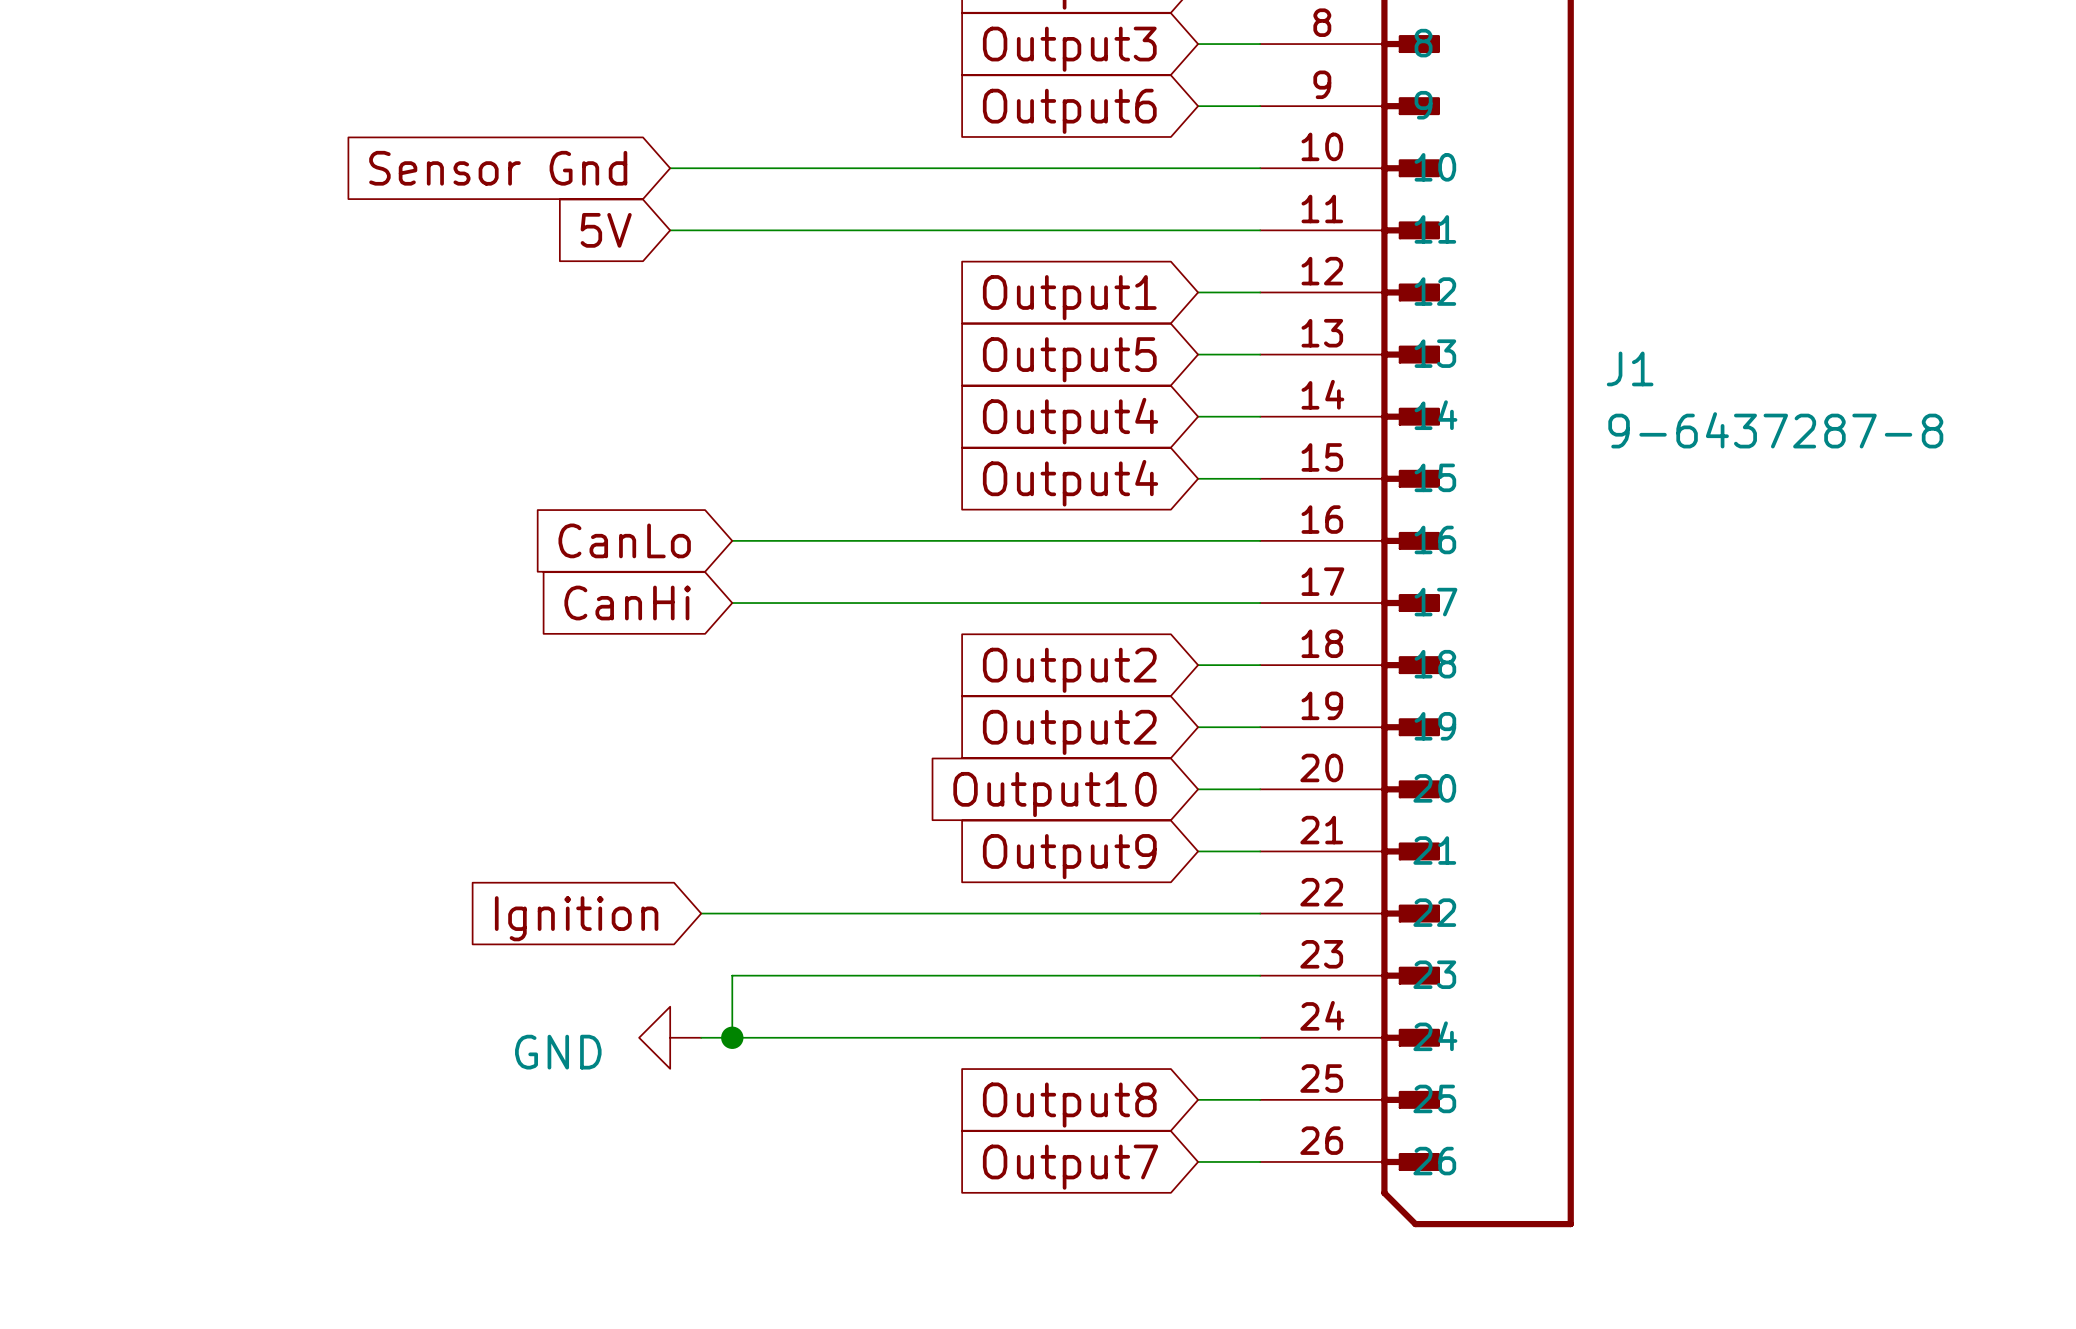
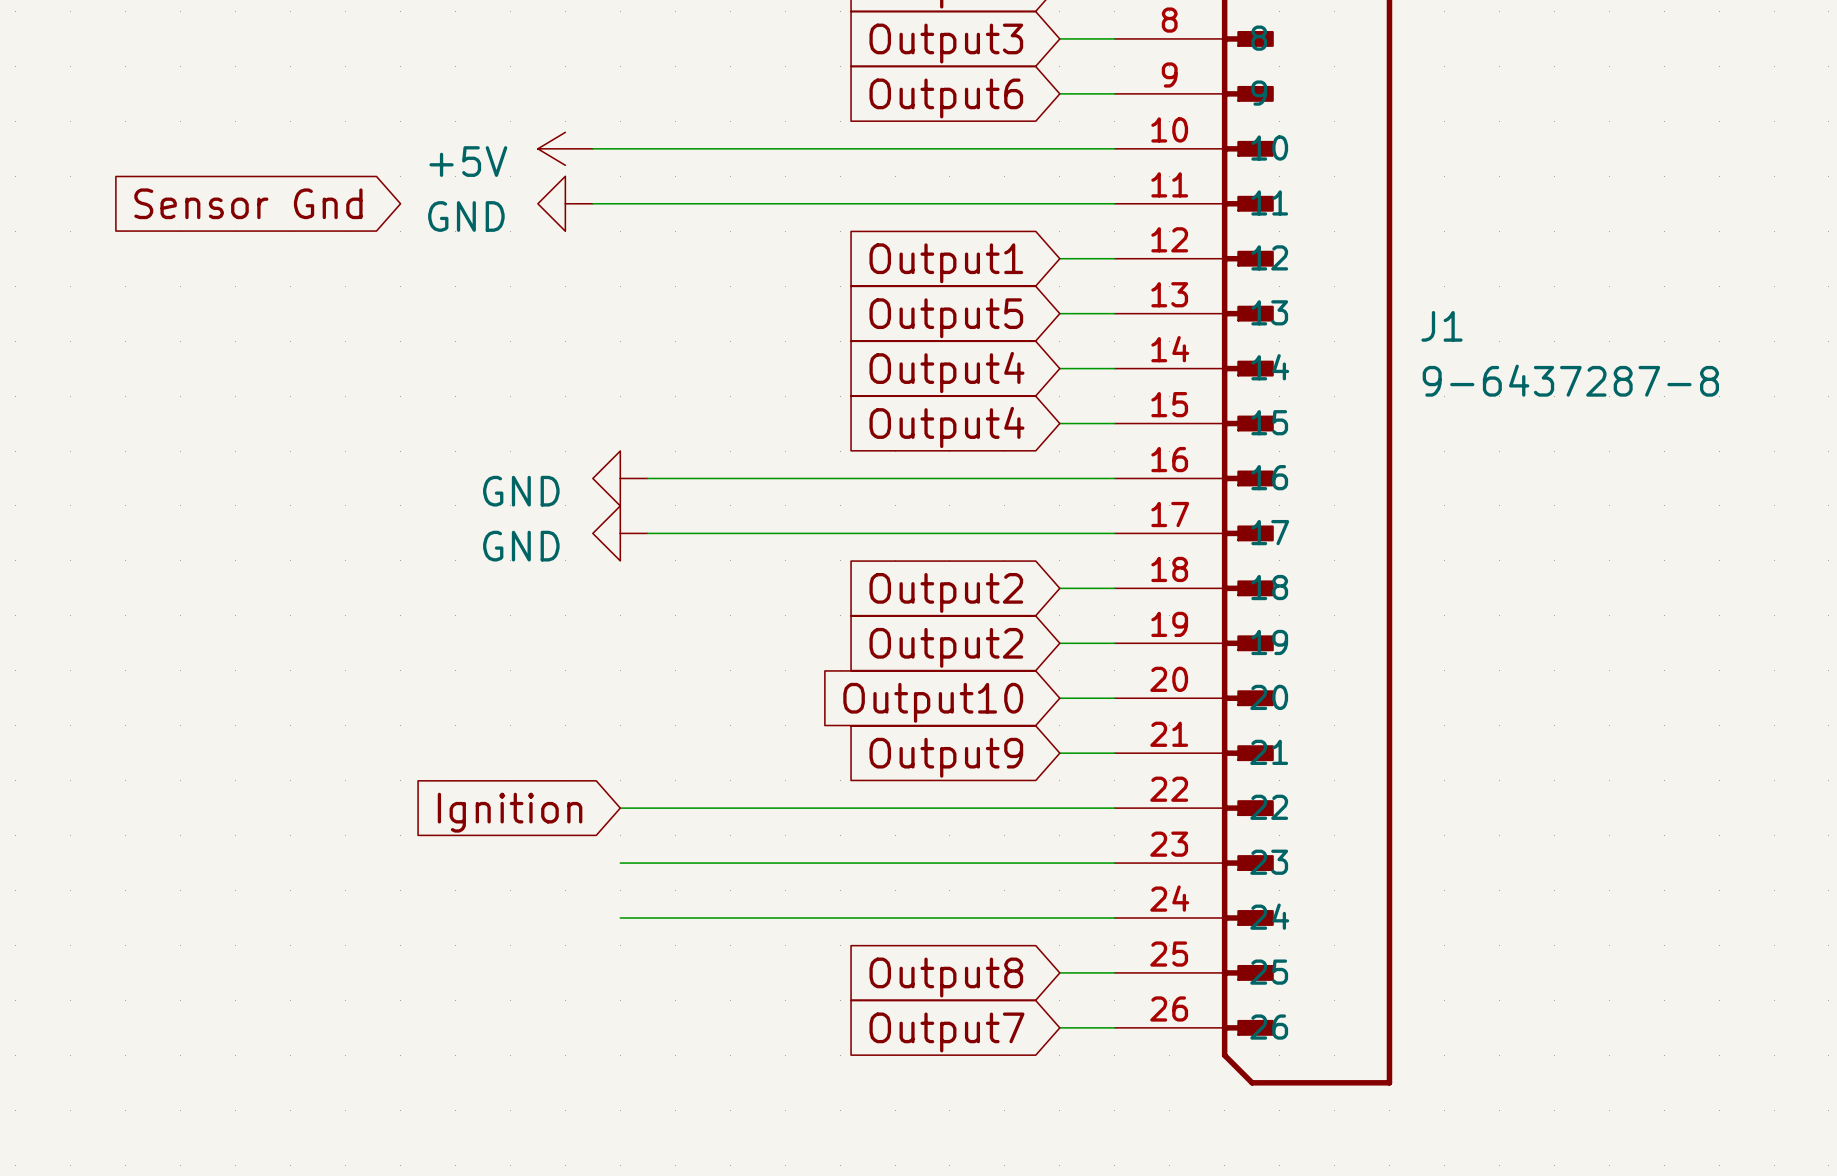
global label position: Sensor Gnd (498, 168) -> Sensor Gnd (248, 203)
power symbol: none -> +5V (565, 148)
global label: 5V (606, 230) -> none
power symbol: none -> GND (565, 203)
global label: CanLo (624, 540) -> none
power symbol: none -> GND (620, 478)
global label: CanHi (627, 603) -> none
power symbol: none -> GND (620, 533)
wire: (732, 975) (732, 1037) -> (647, 863) (620, 863)
power symbol: GND (670, 1037) -> none
junction: (732, 1037) -> none

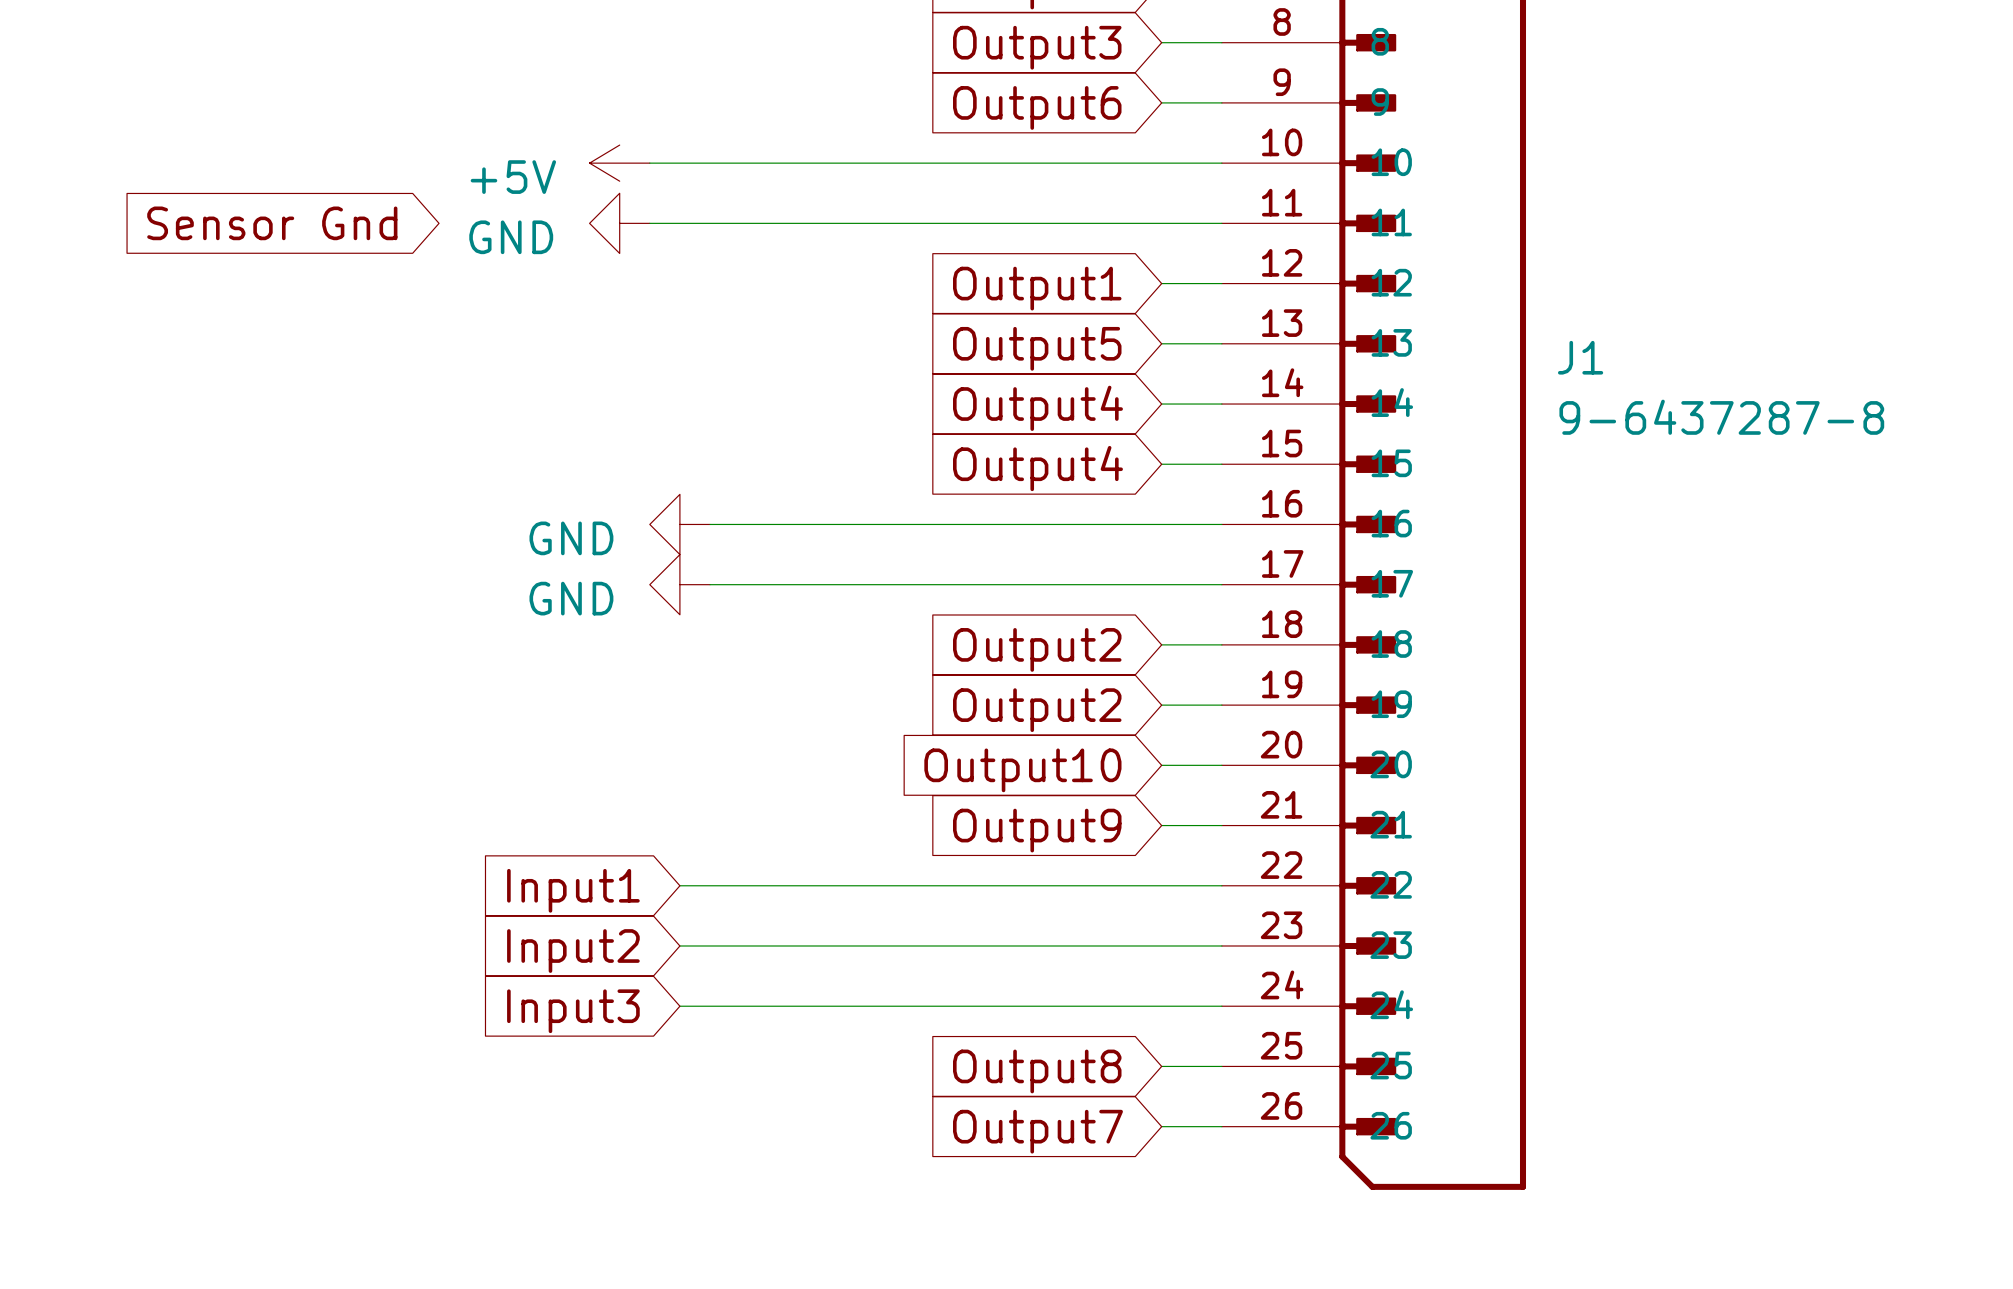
global label: Ignition (510, 812) -> Input1 (573, 890)
global label: none -> Input2 (573, 951)
global label: none -> Input3 (573, 1011)

